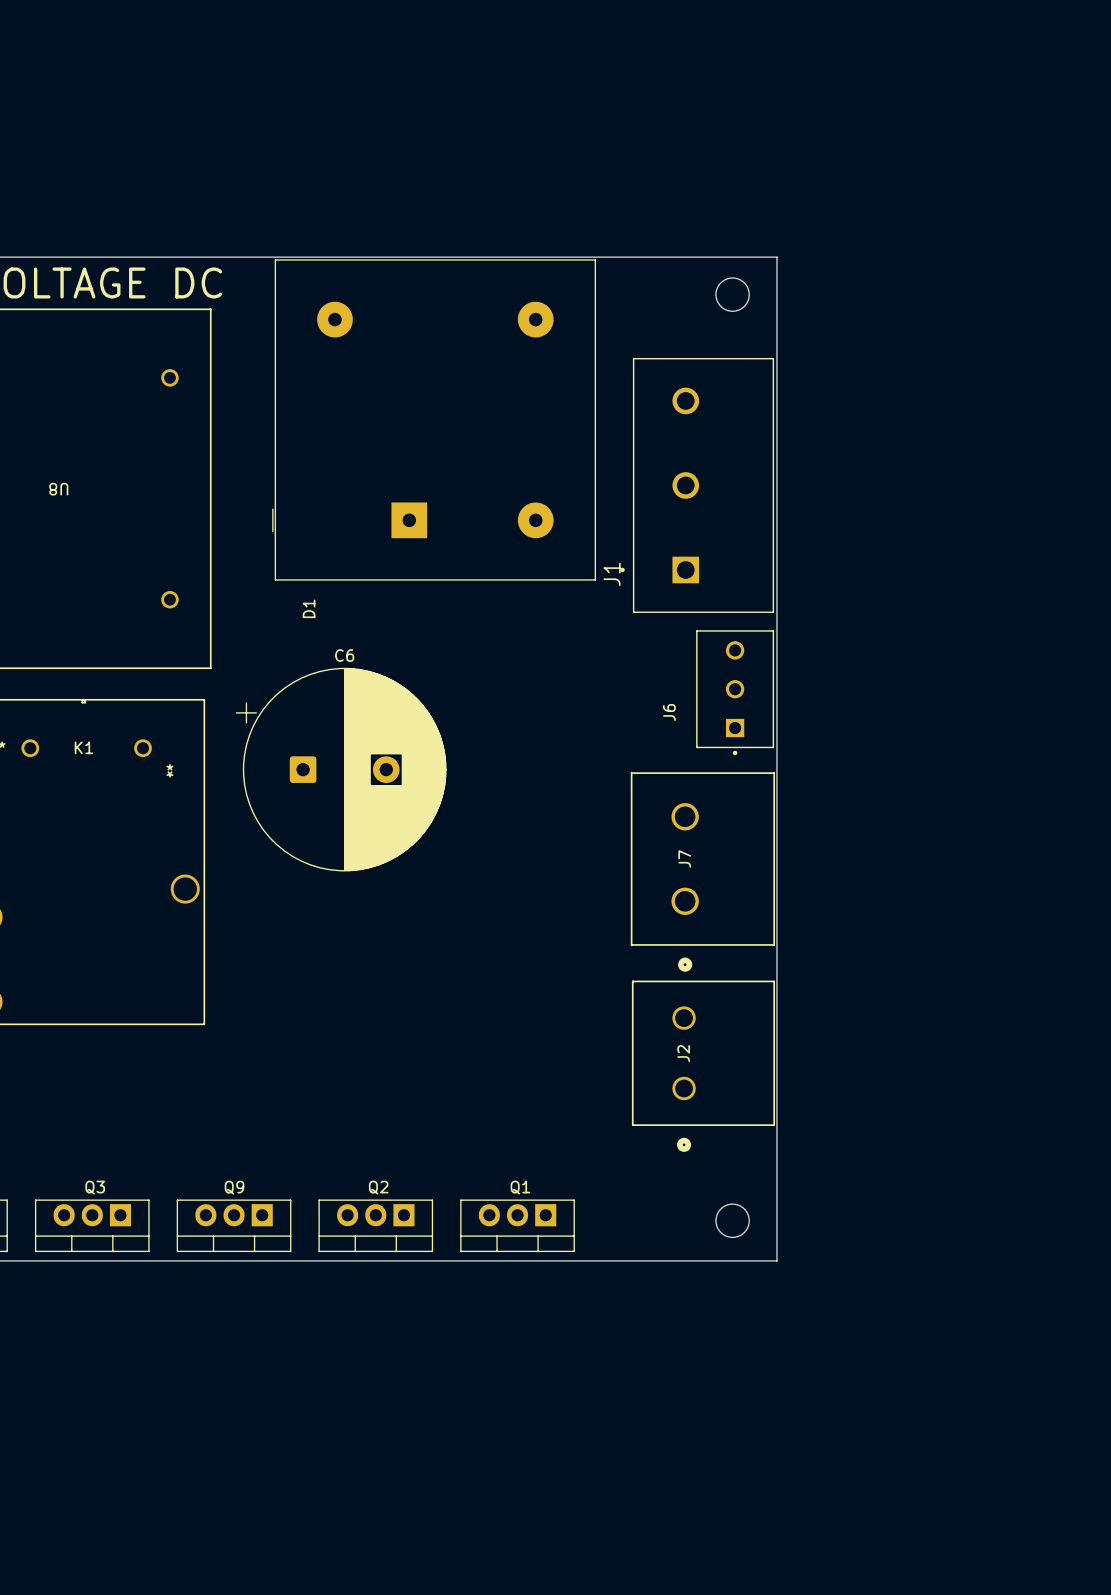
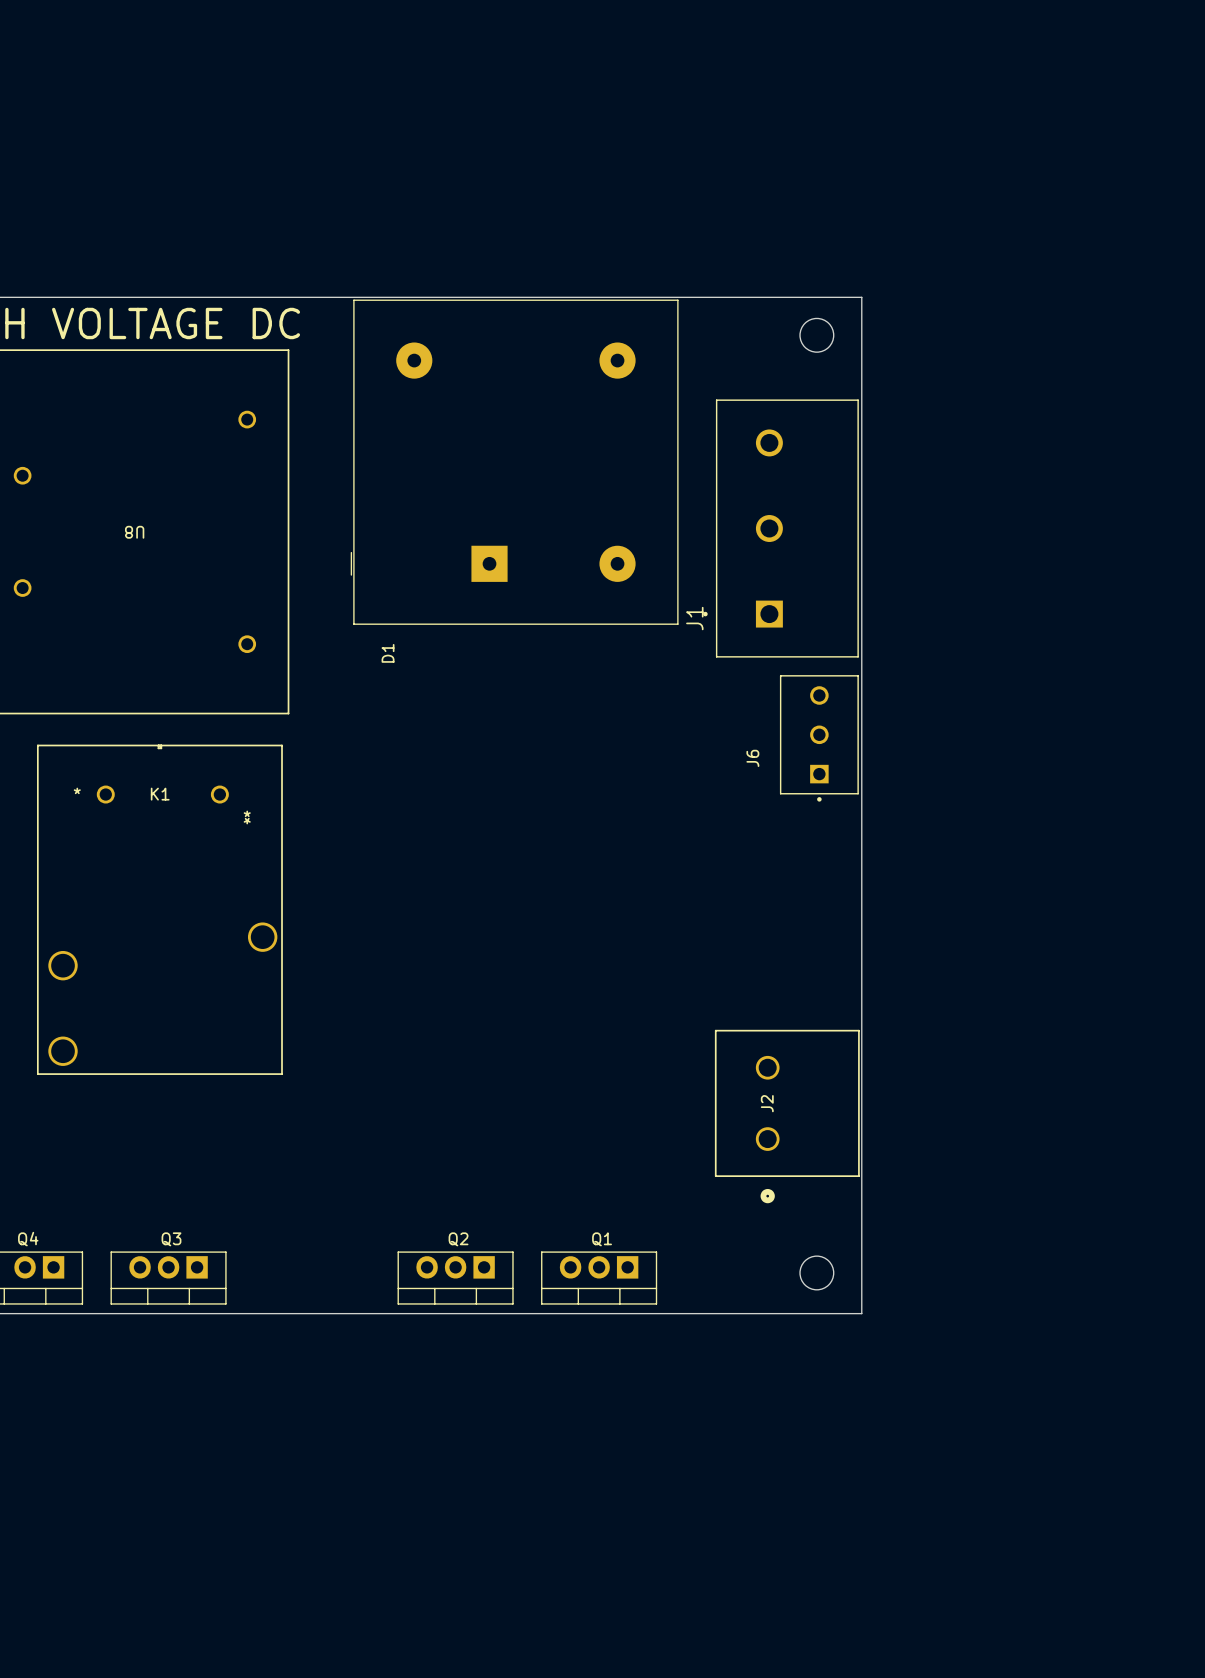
C6: (341, 769) -> none
J7: (702, 871) -> none
Q9: (234, 1225) -> none

